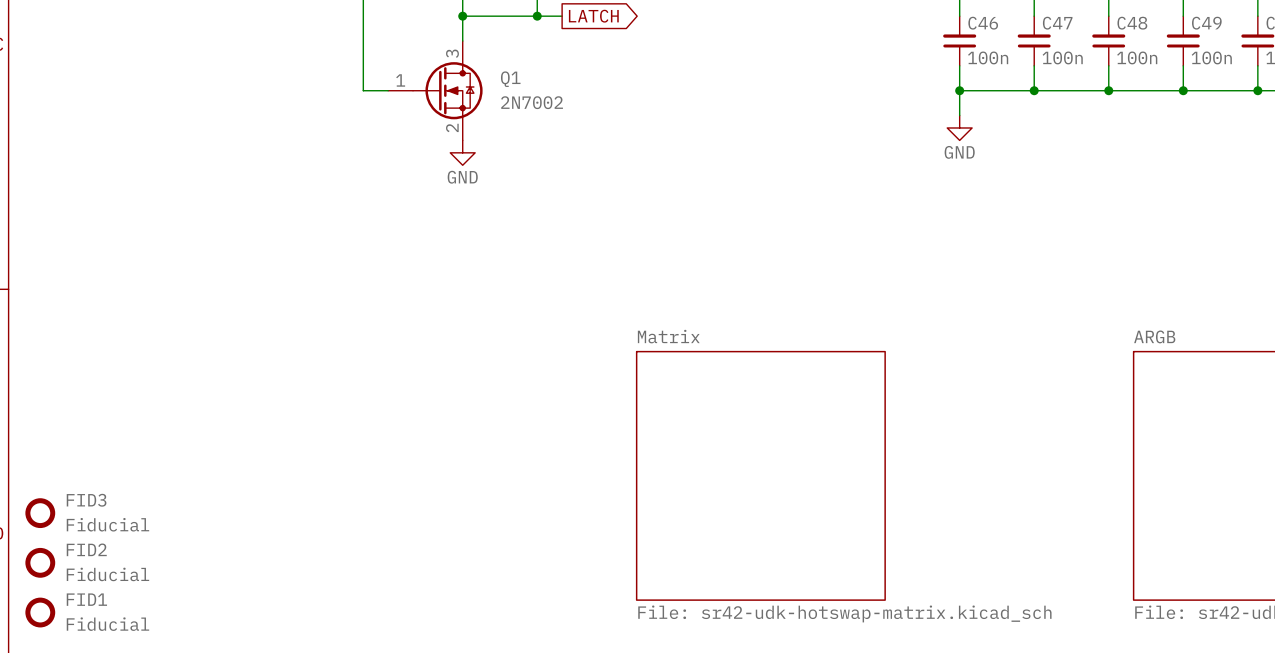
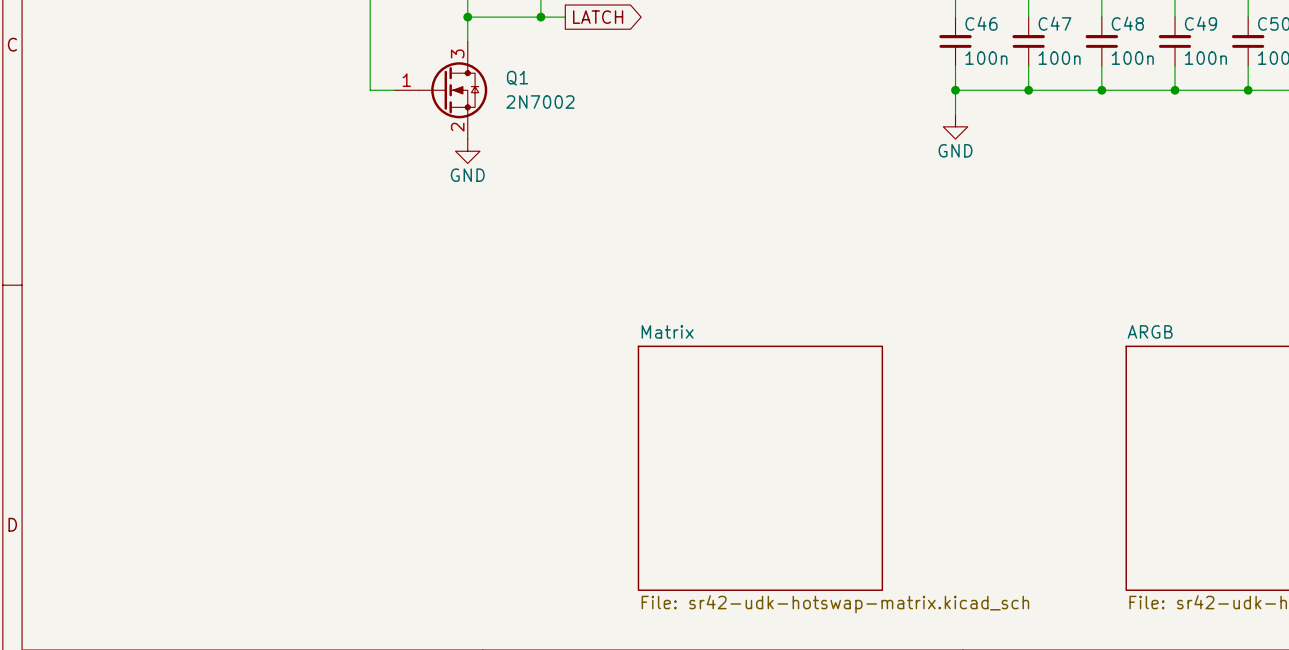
FID3: Fiducial (40, 513) -> none
FID2: Fiducial (40, 562) -> none
FID1: Fiducial (40, 612) -> none

